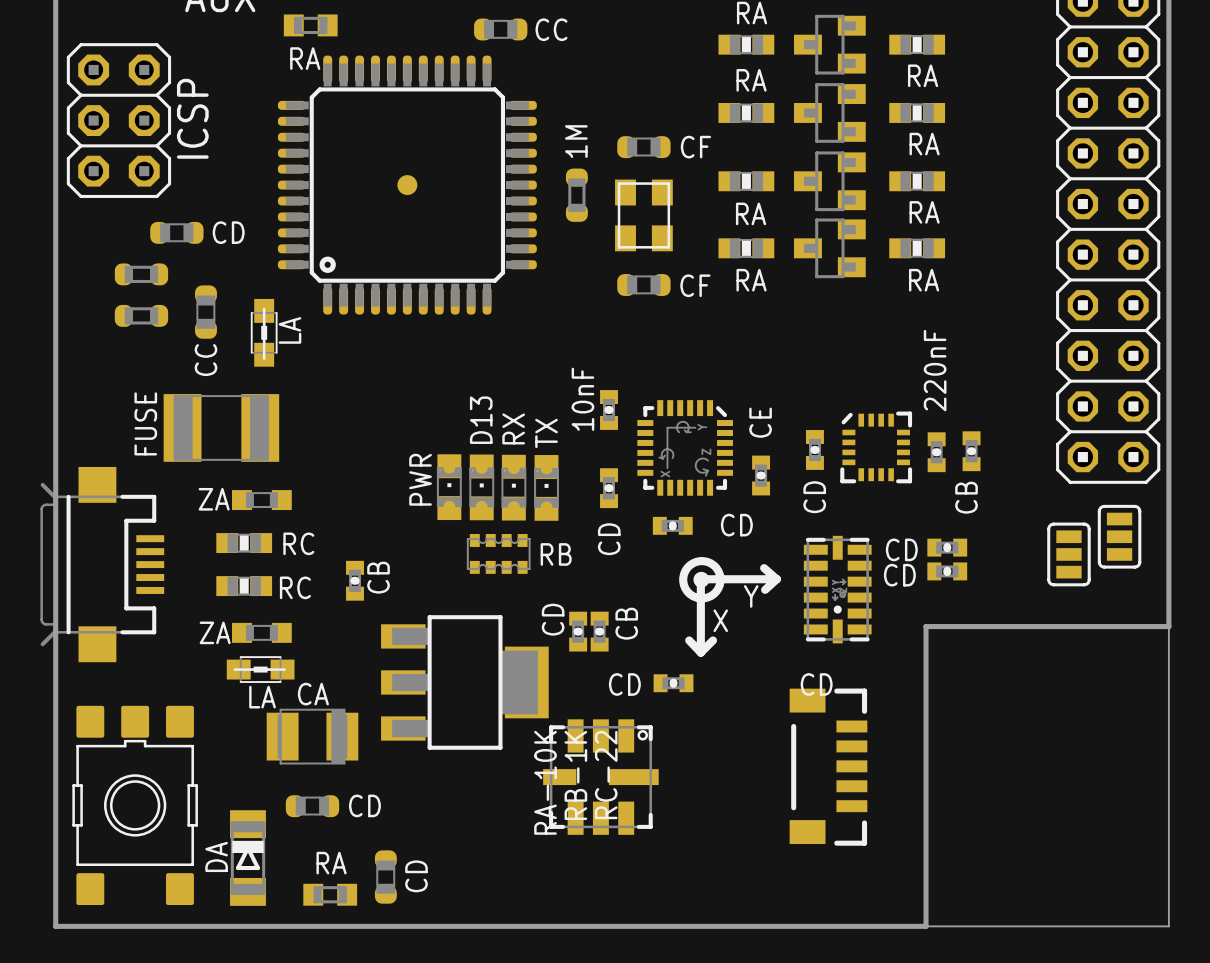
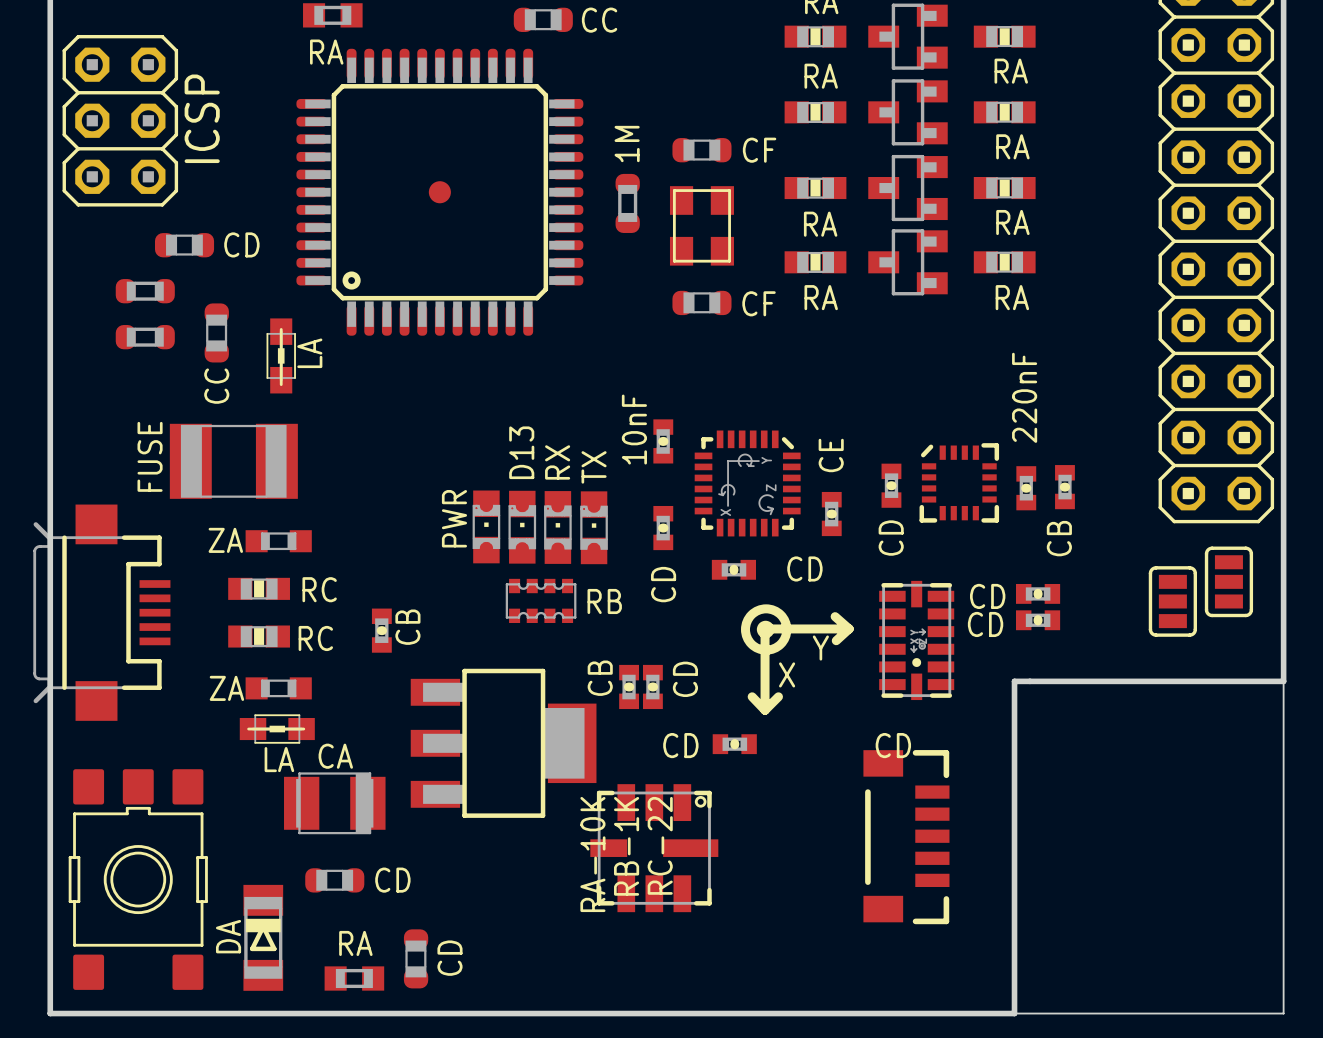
text position: CD (553, 619) -> CD (685, 679)
text position: CB (626, 623) -> CB (600, 678)

